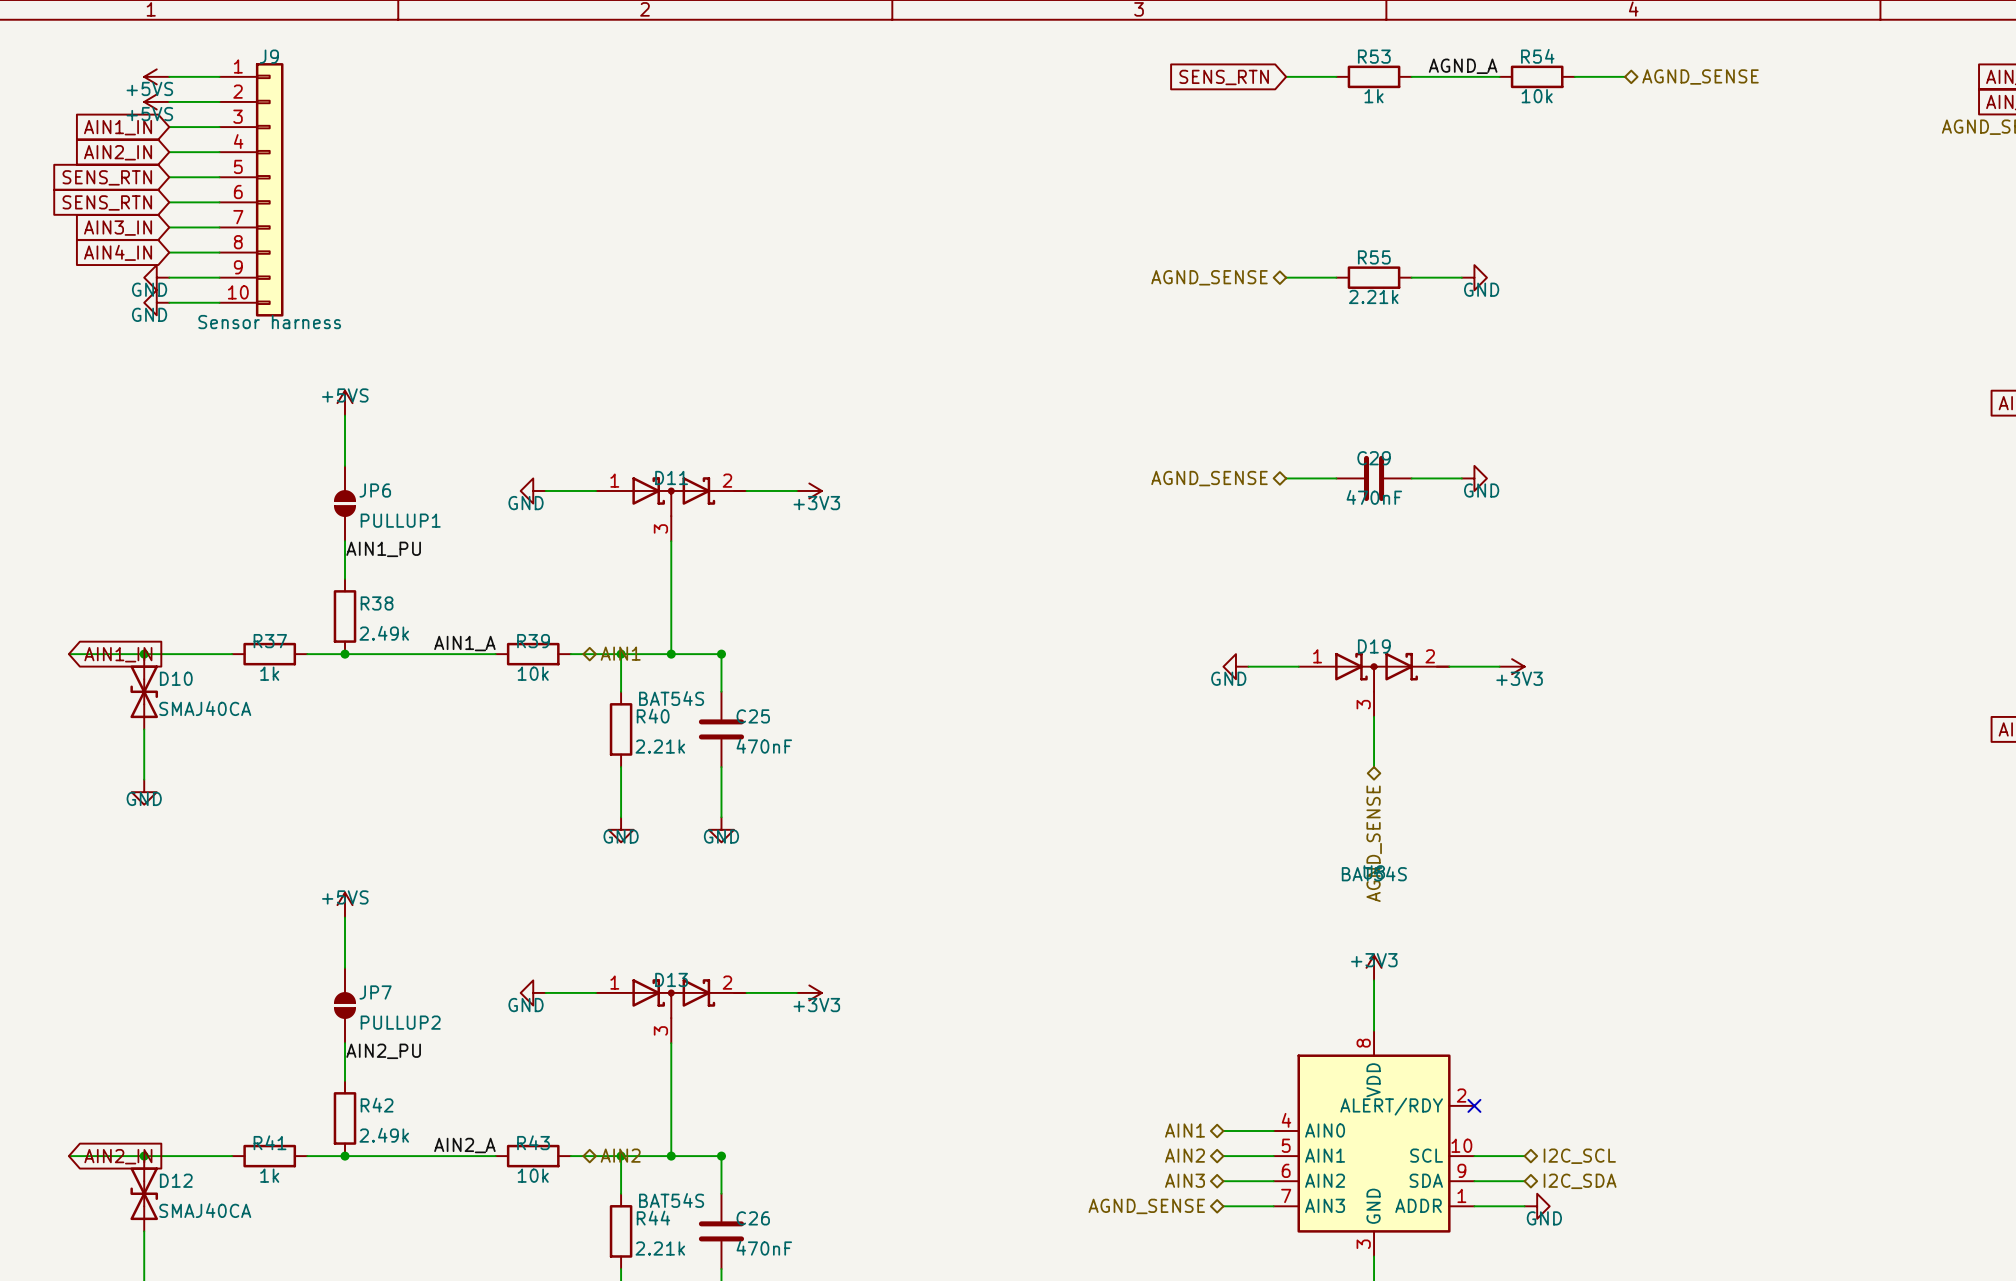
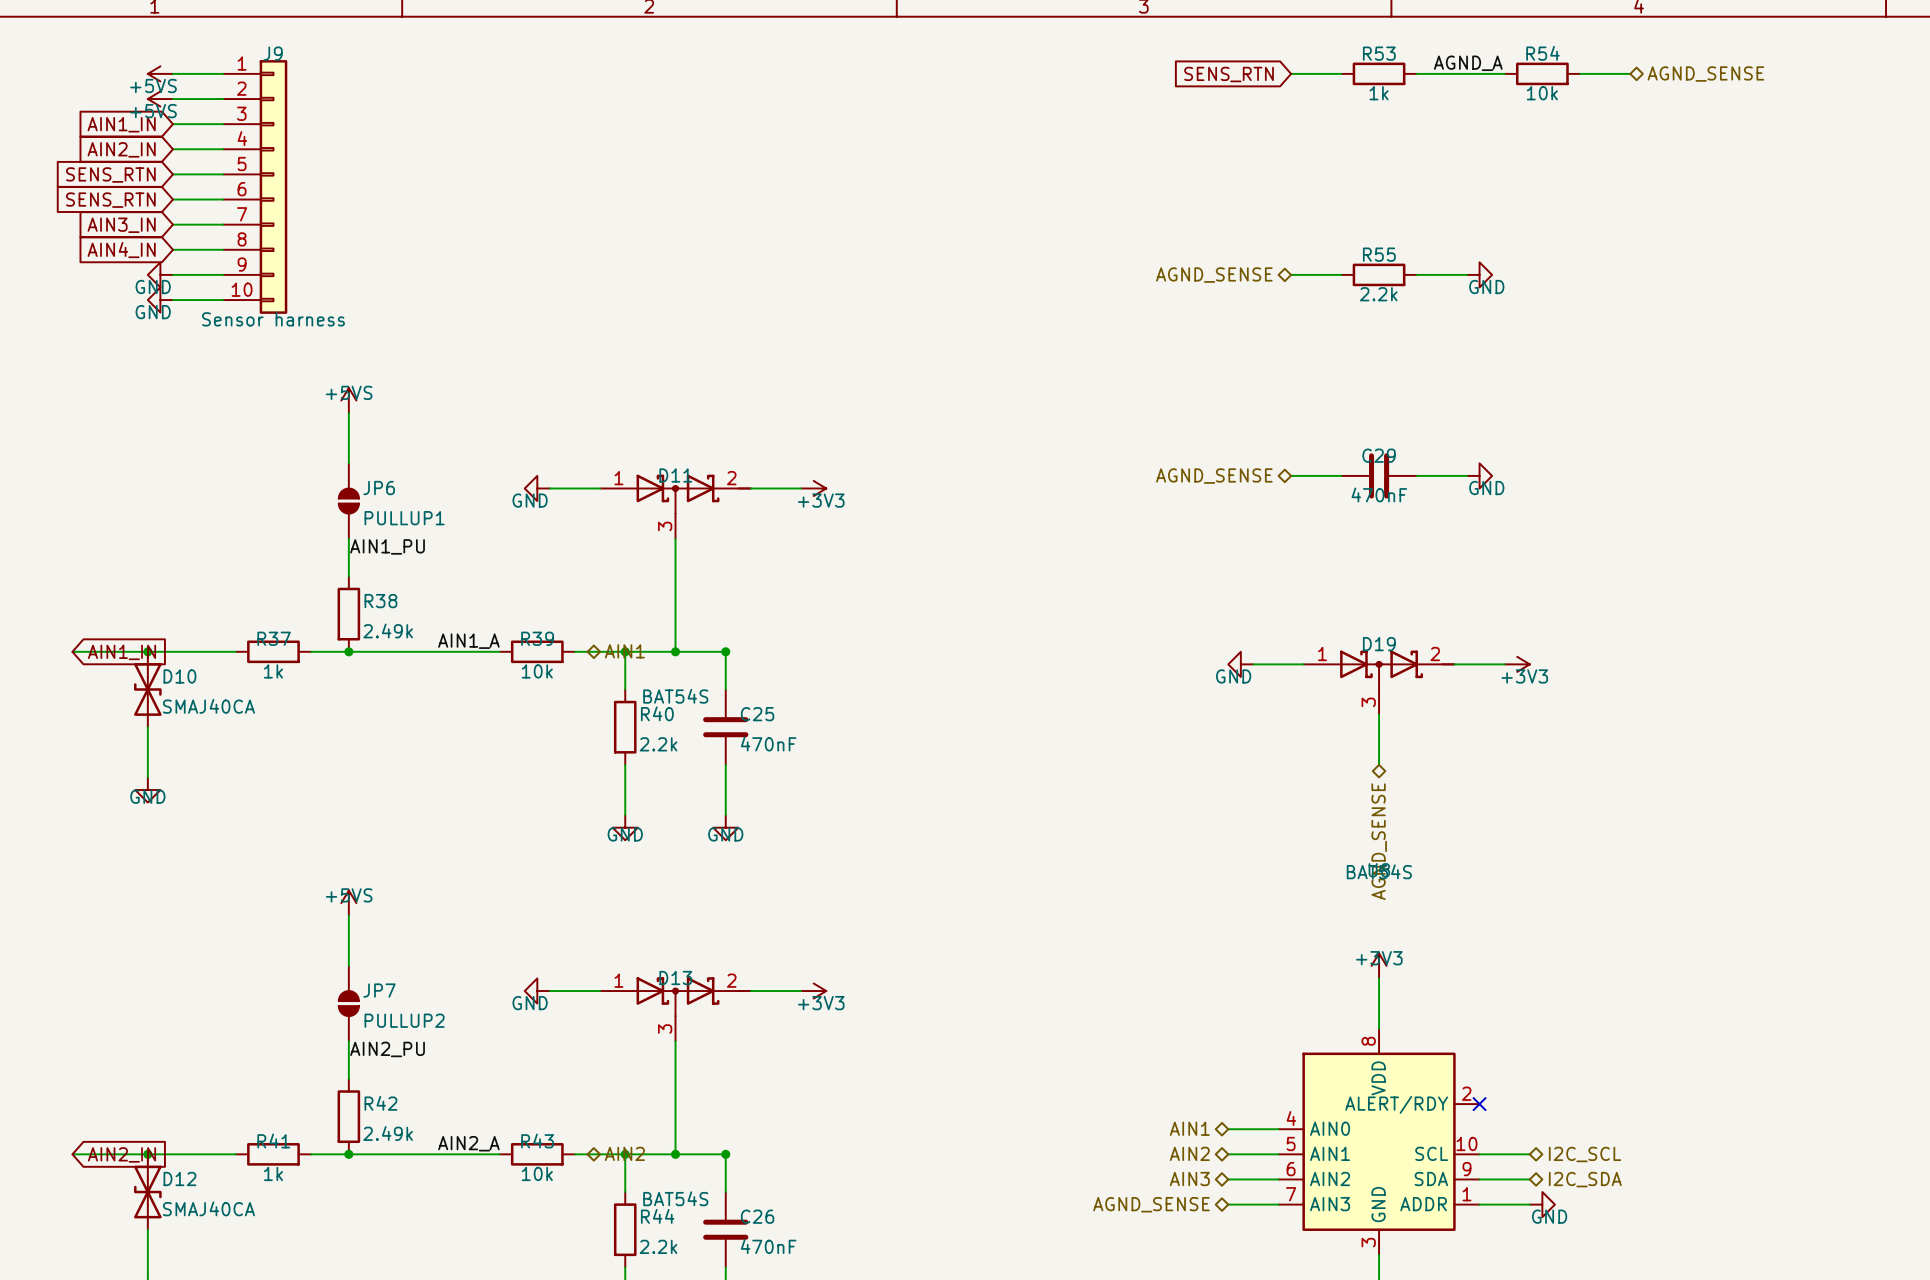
R55 value: 2.21k (1373, 296) -> 2.2k (1378, 294)
R40 value: 2.21k (660, 746) -> 2.2k (658, 744)
R44 value: 2.21k (660, 1248) -> 2.2k (658, 1246)

